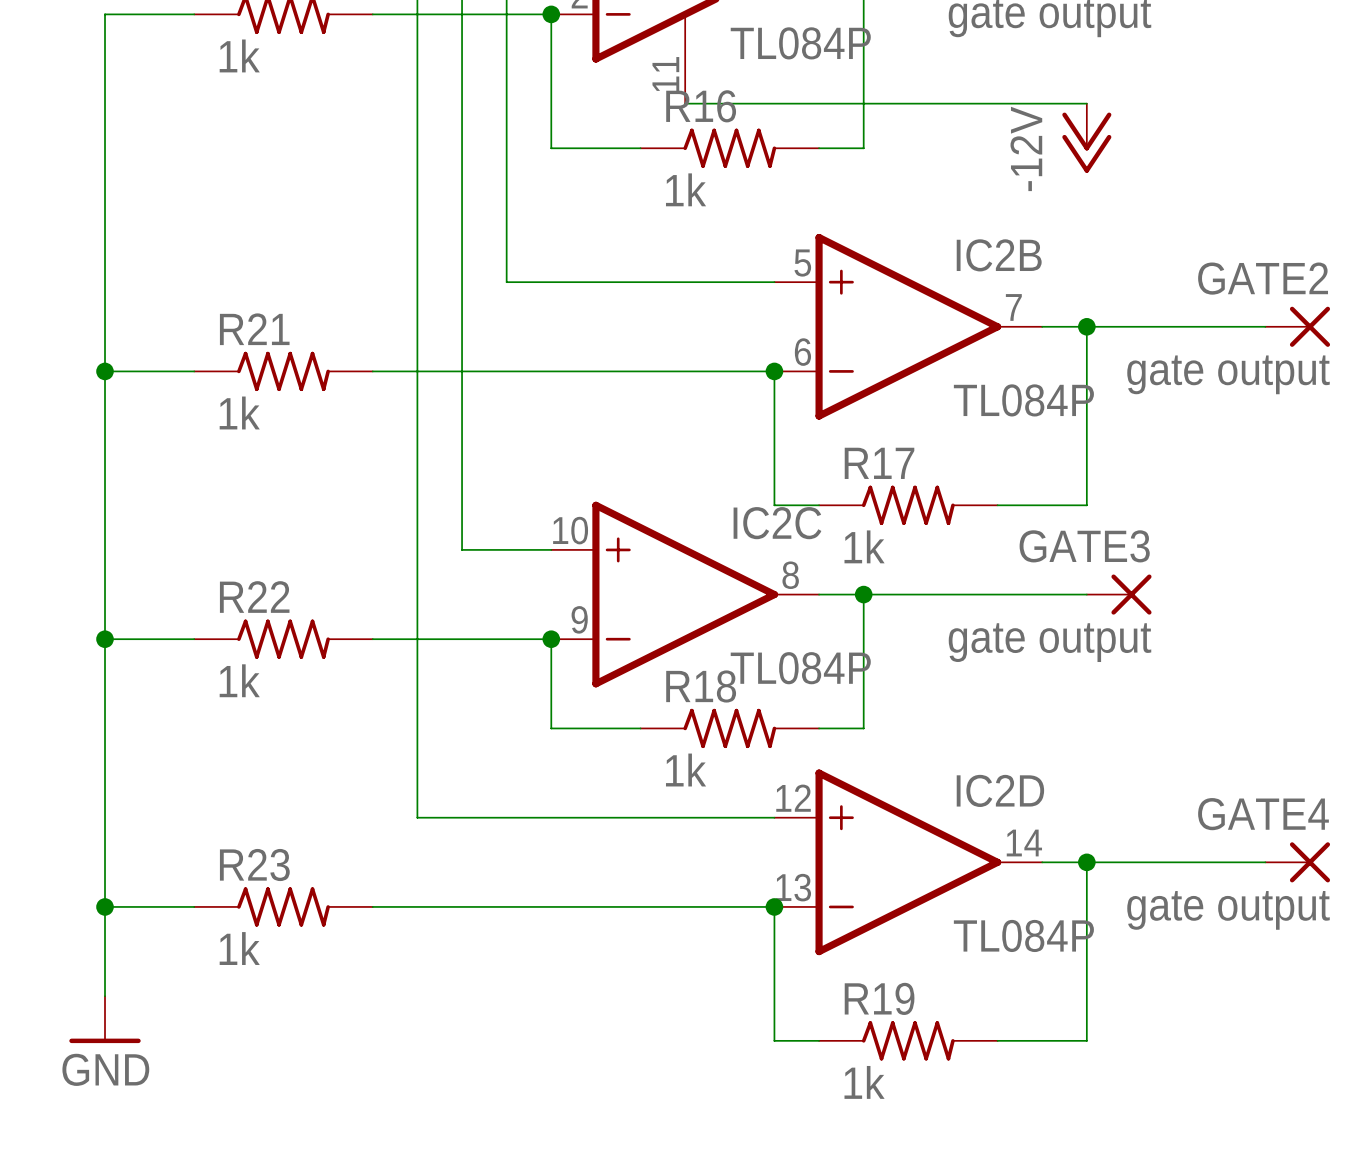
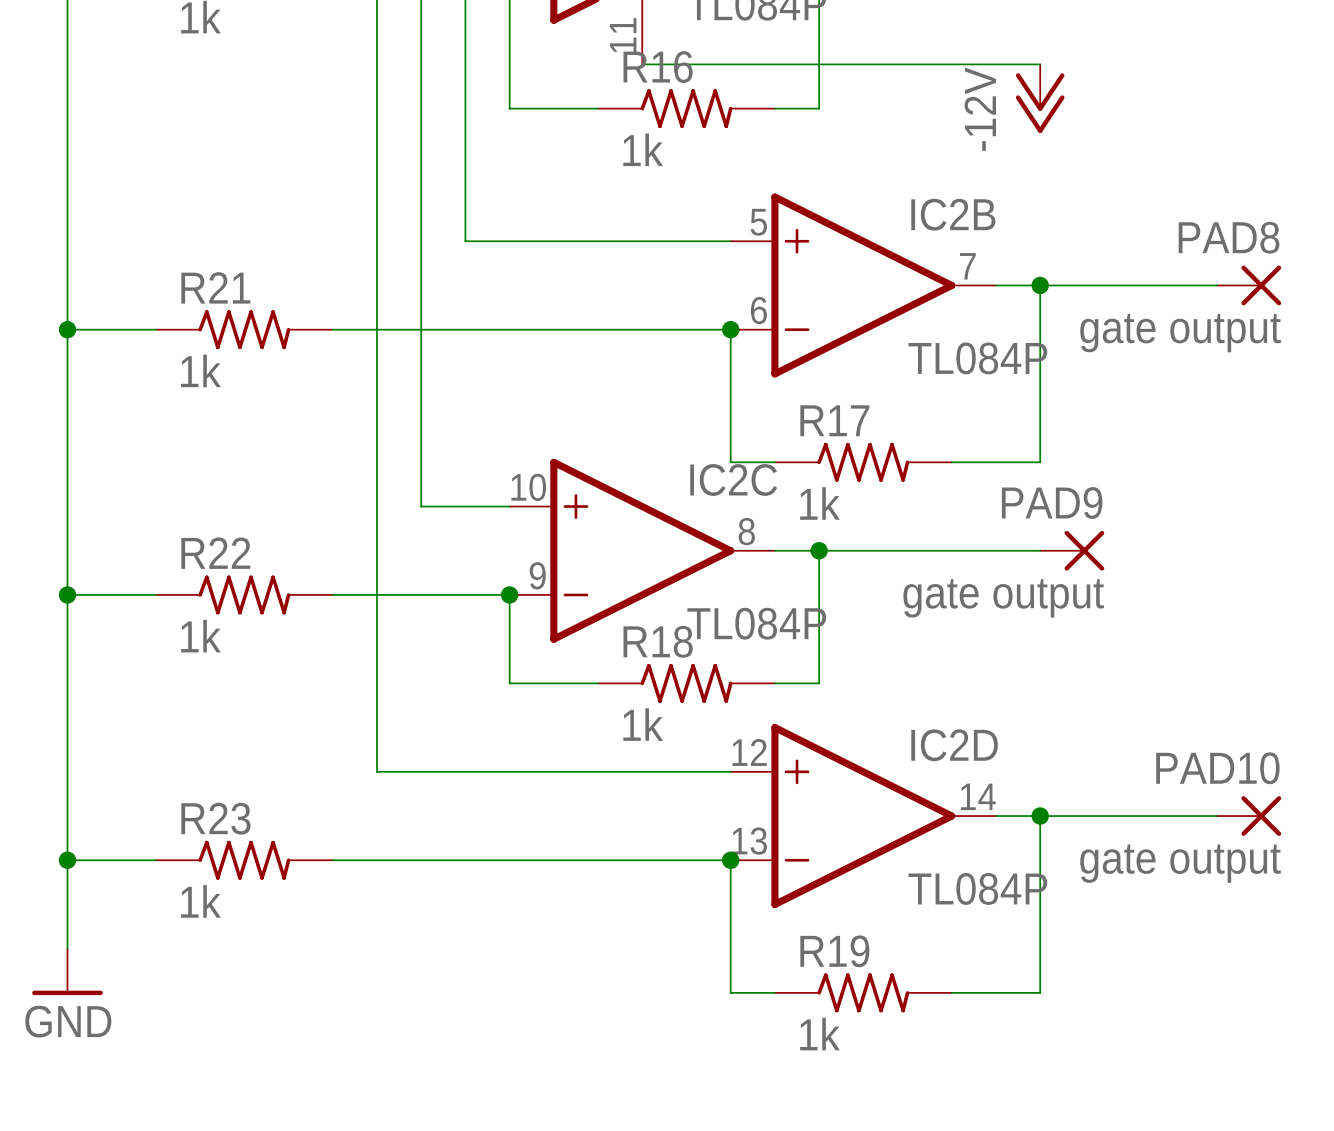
GATE2 name: GATE2 (1263, 278) -> PAD8 (1229, 237)
GATE3 name: GATE3 (1084, 546) -> PAD9 (1052, 502)
GATE4 name: GATE4 (1263, 814) -> PAD10 (1217, 768)

